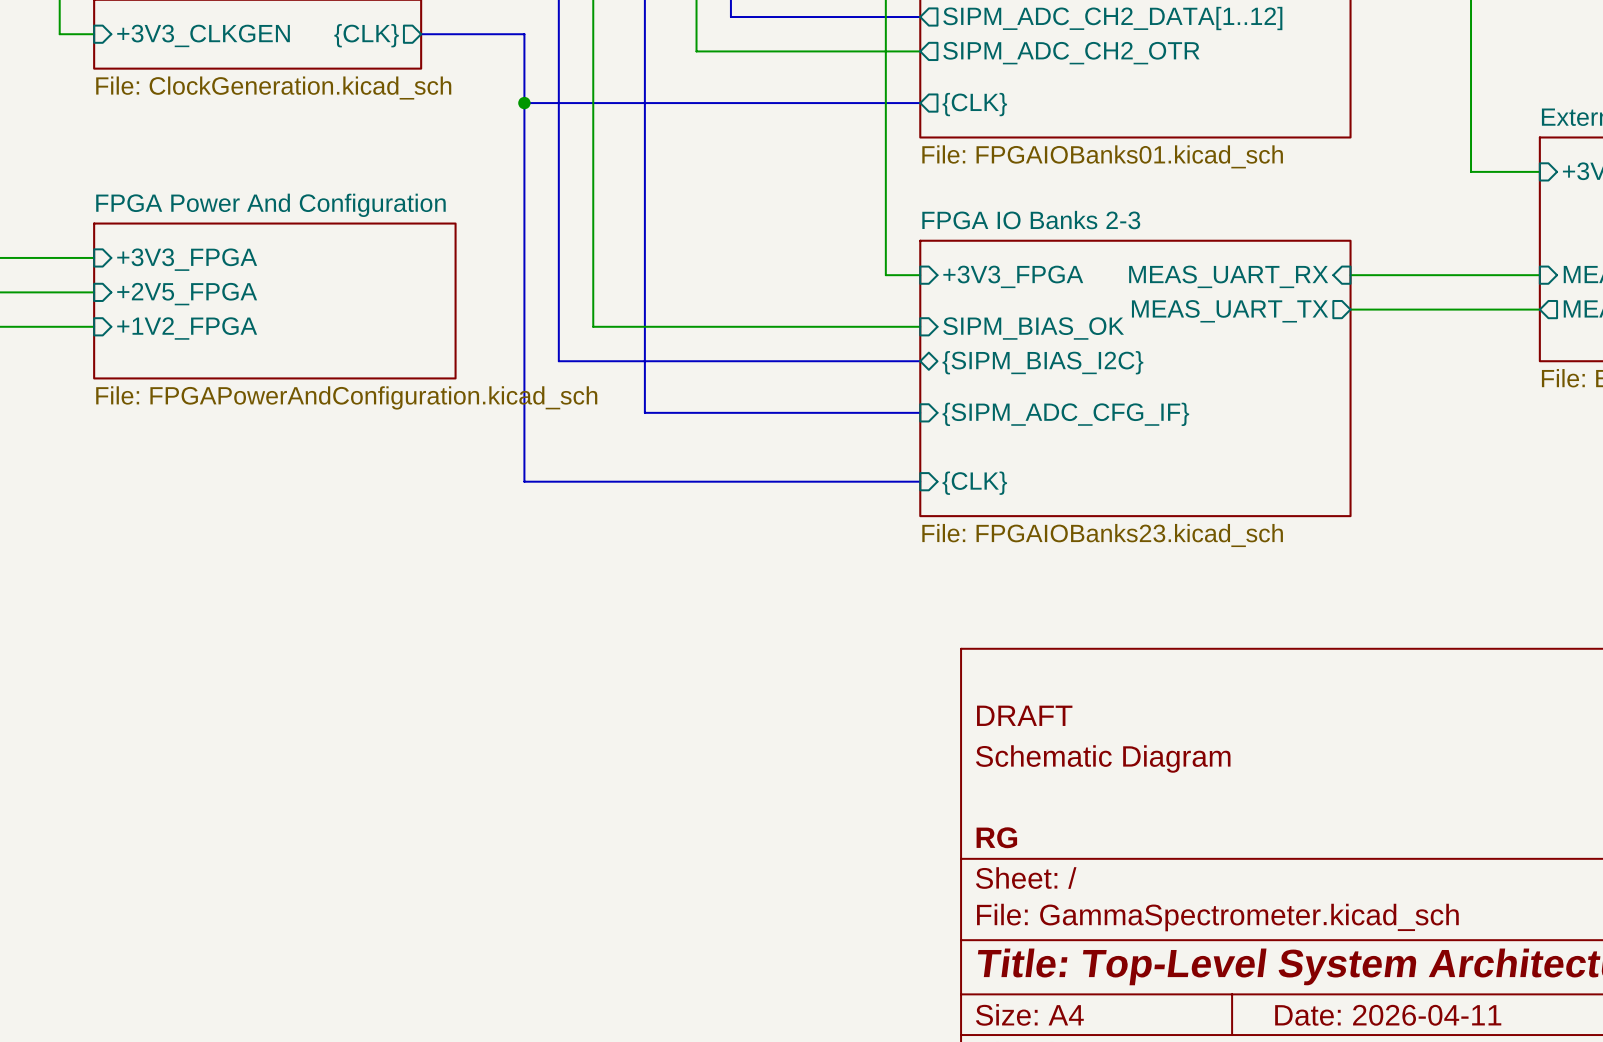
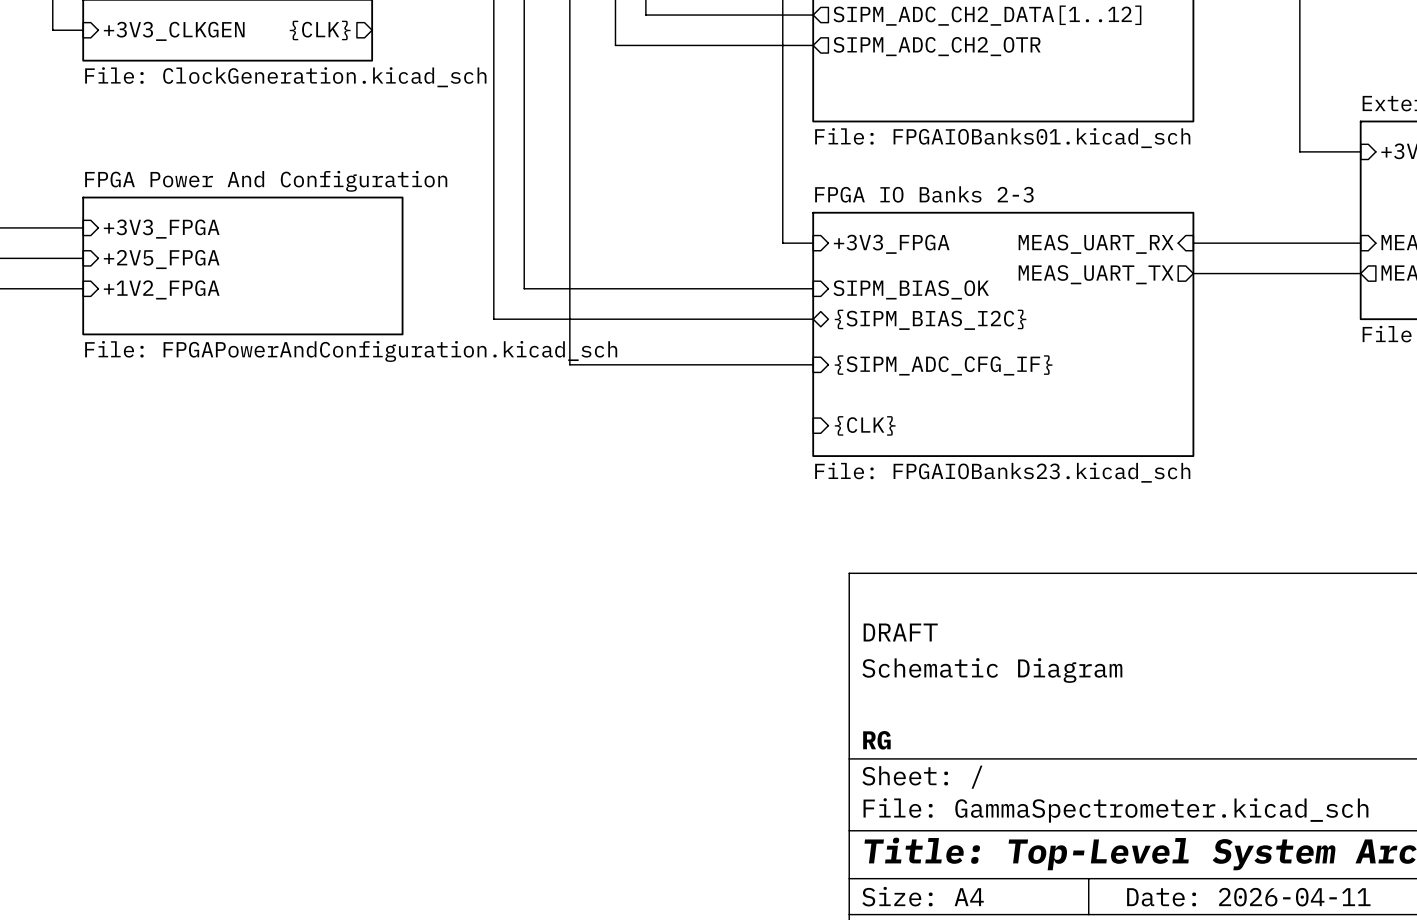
bus: (421, 34) (524, 34) (524, 481) (920, 481) -> none
bus: (524, 103) (920, 103) -> none
junction: (524, 103) -> none
sheet pin: {CLK} (974, 104) -> none

